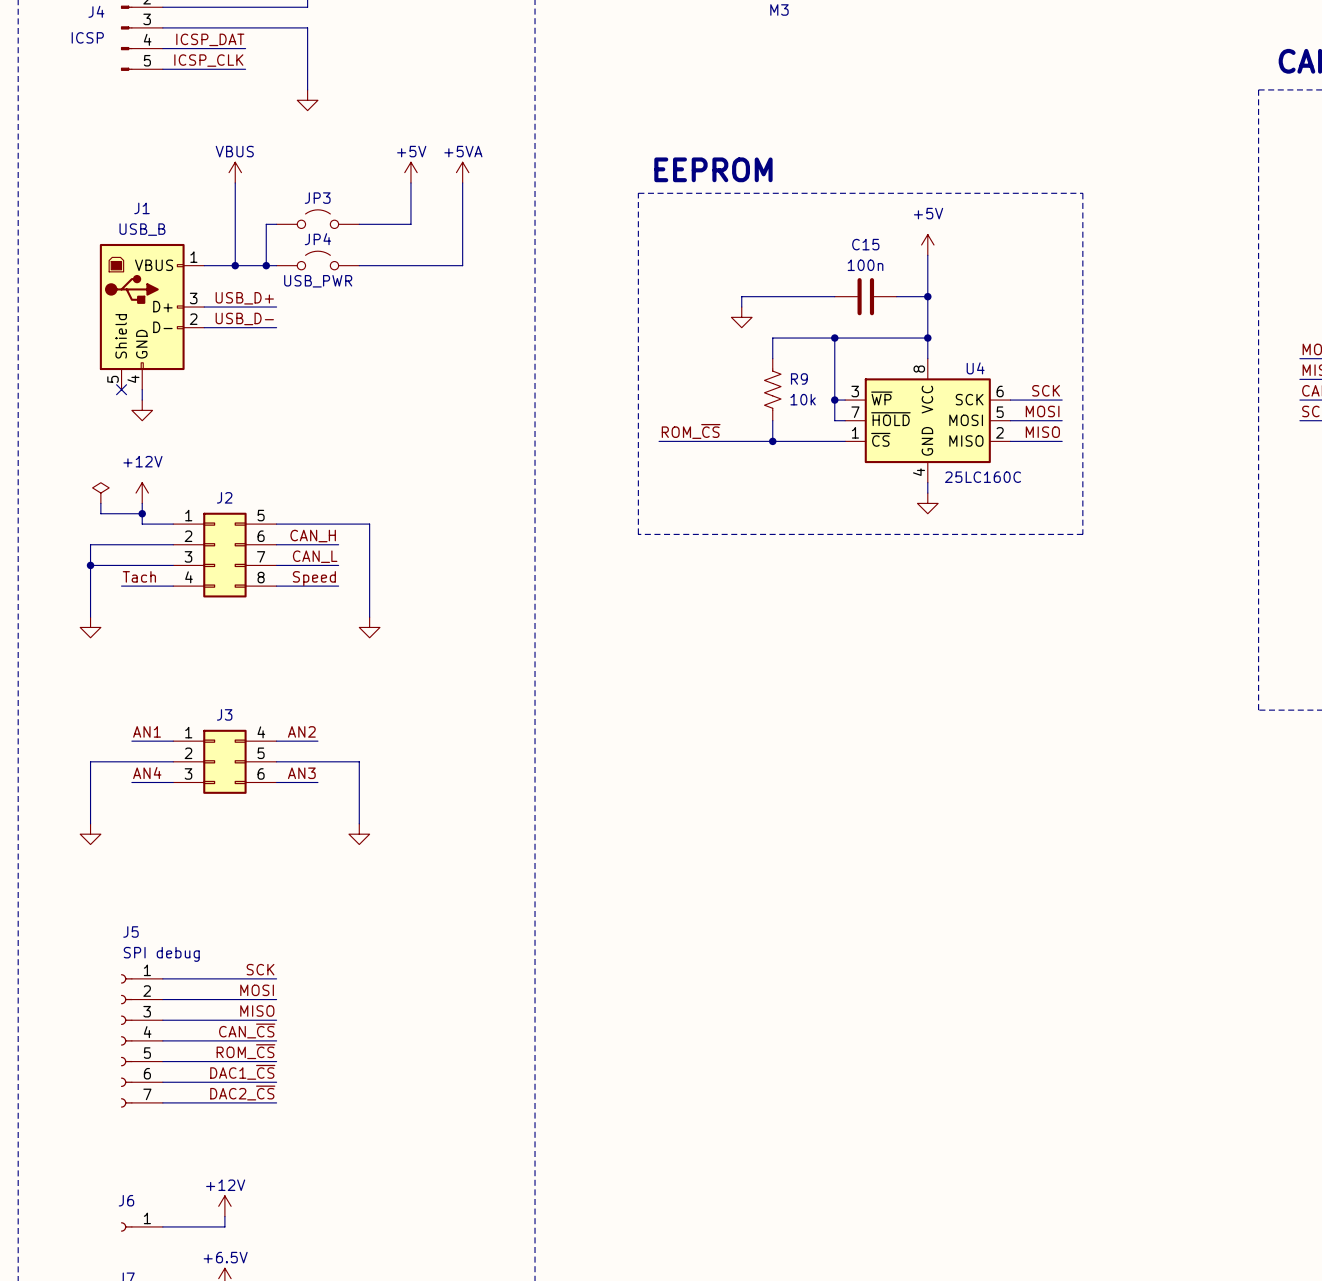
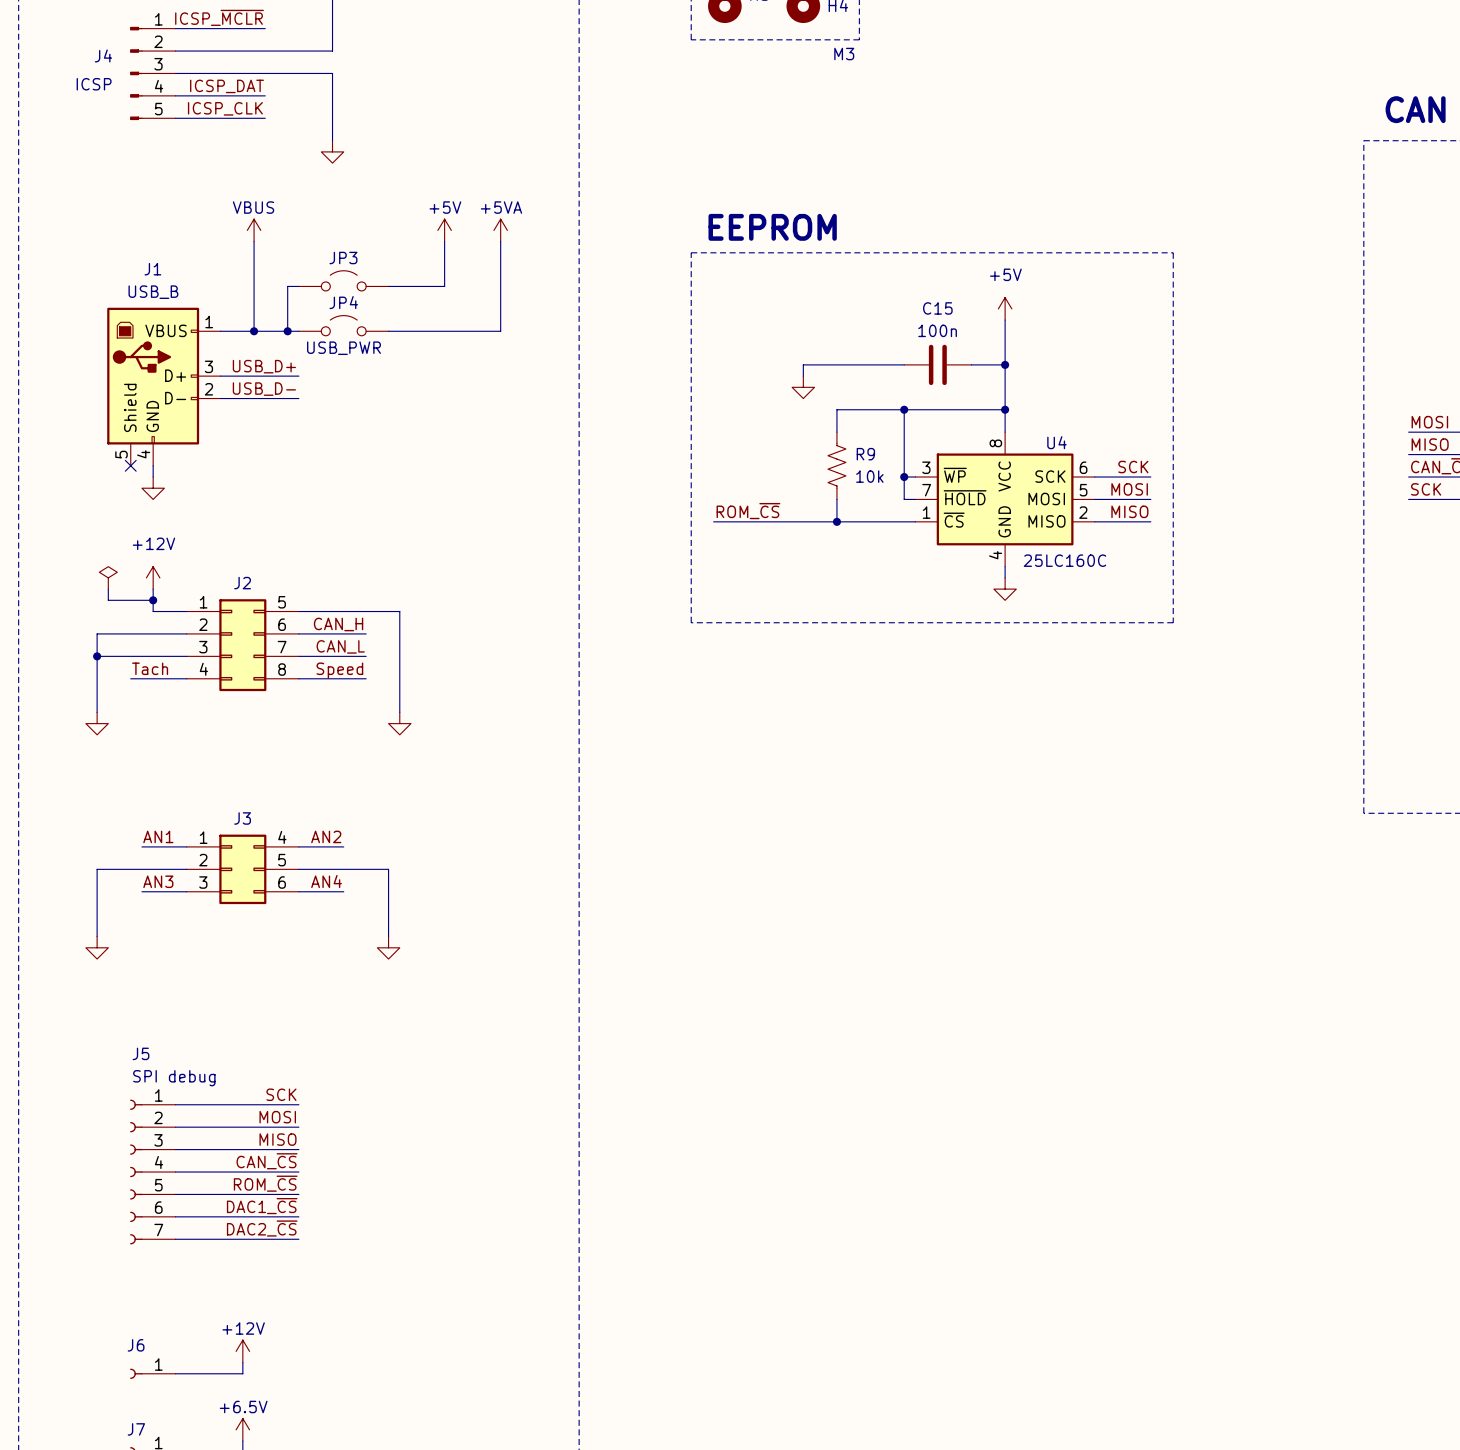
label: AN4 (147, 773) -> AN3 (158, 881)
label: AN3 (301, 773) -> AN4 (326, 881)

